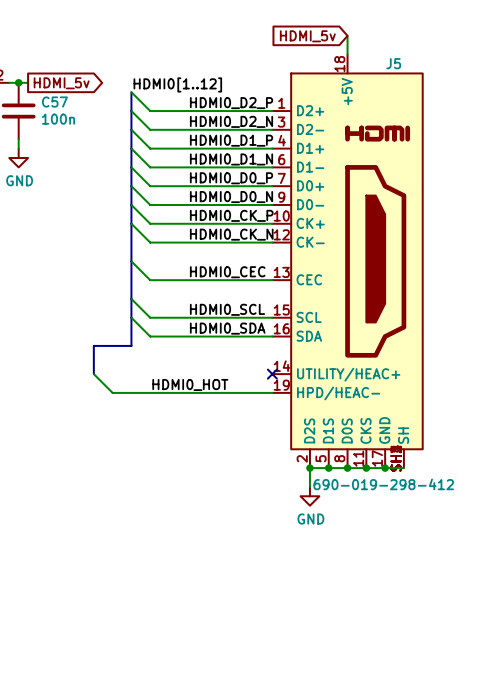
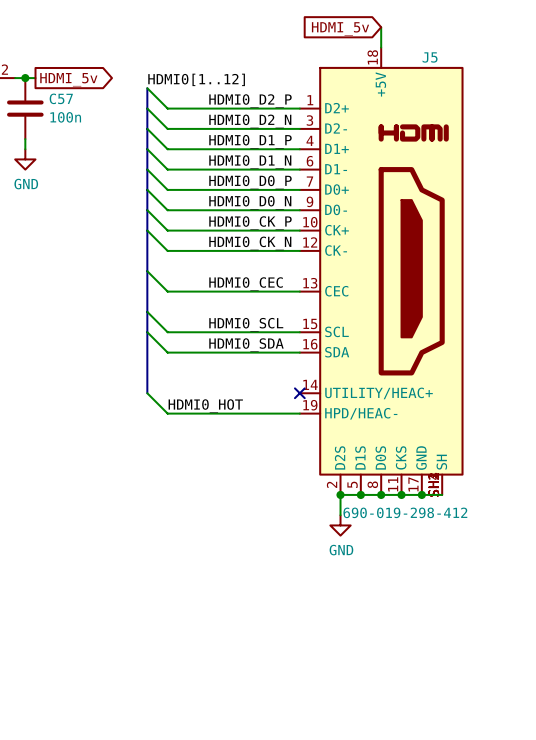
bus: (131, 345) (93, 345) (93, 374) -> (147, 362) (147, 393)
wire: (93, 374) (112, 392) (150, 392) -> (147, 393) (167, 413)

